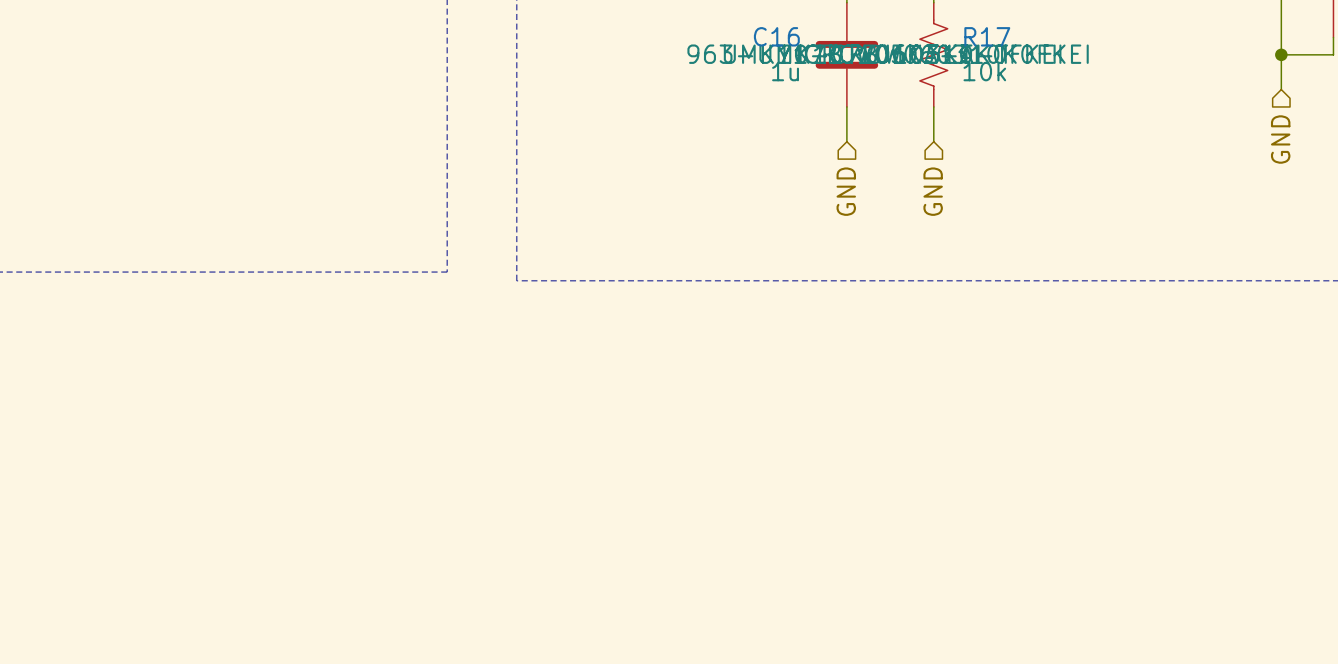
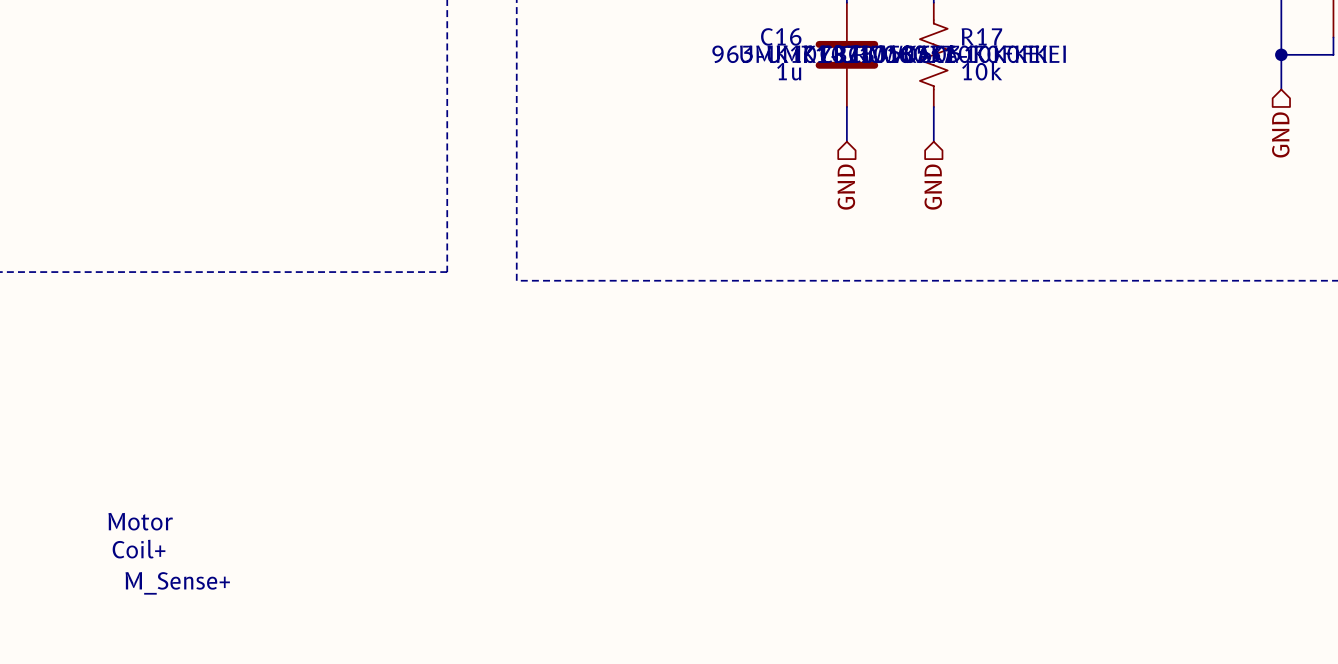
text: none -> Motor (140, 521)
text: none -> Coil+ (139, 549)
text: none -> M_Sense+ (177, 583)

